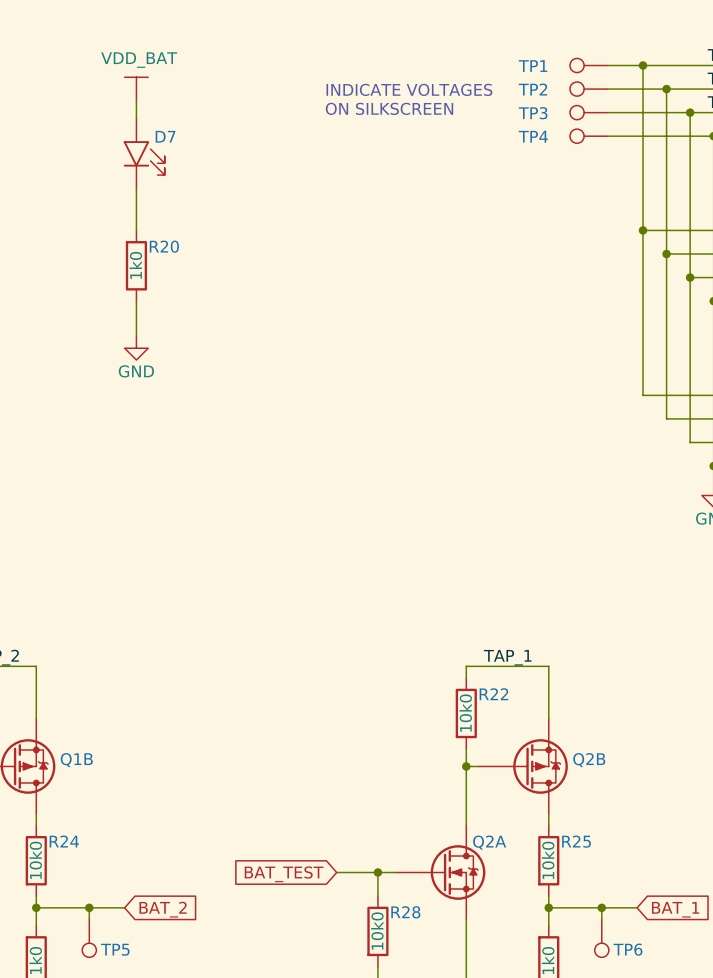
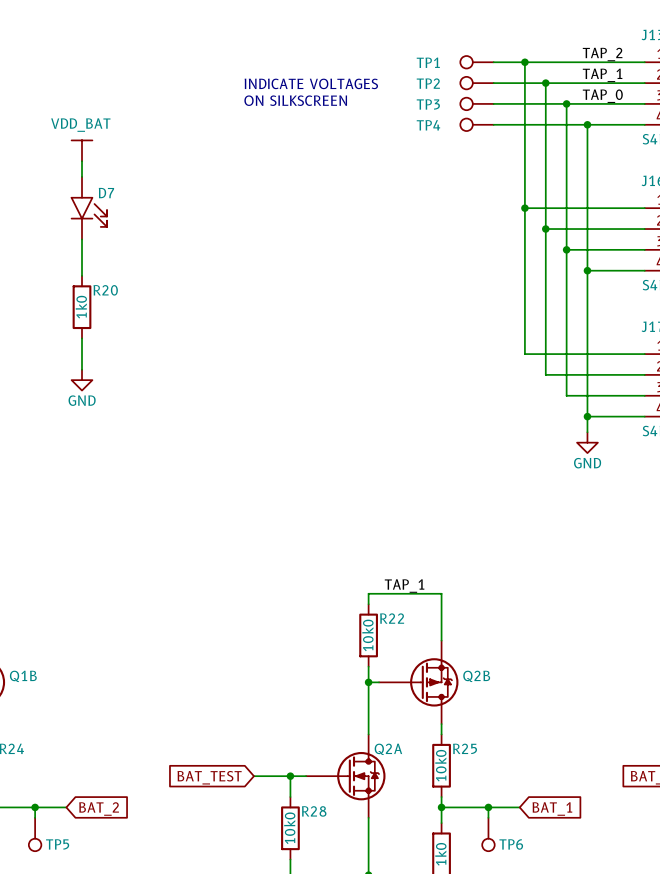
power symbol position: VDD_BAT (136, 89) -> VDD_BAT (82, 150)
wire: (136, 100) (136, 118) -> (82, 161) (82, 176)
D7 position: (144, 153) -> (88, 208)
wire: (136, 189) (136, 230) -> (82, 239) (82, 275)
R20 position: (136, 265) -> (82, 307)
wire: (136, 301) (136, 336) -> (82, 338) (82, 369)
power symbol position: GND (136, 348) -> GND (82, 380)

